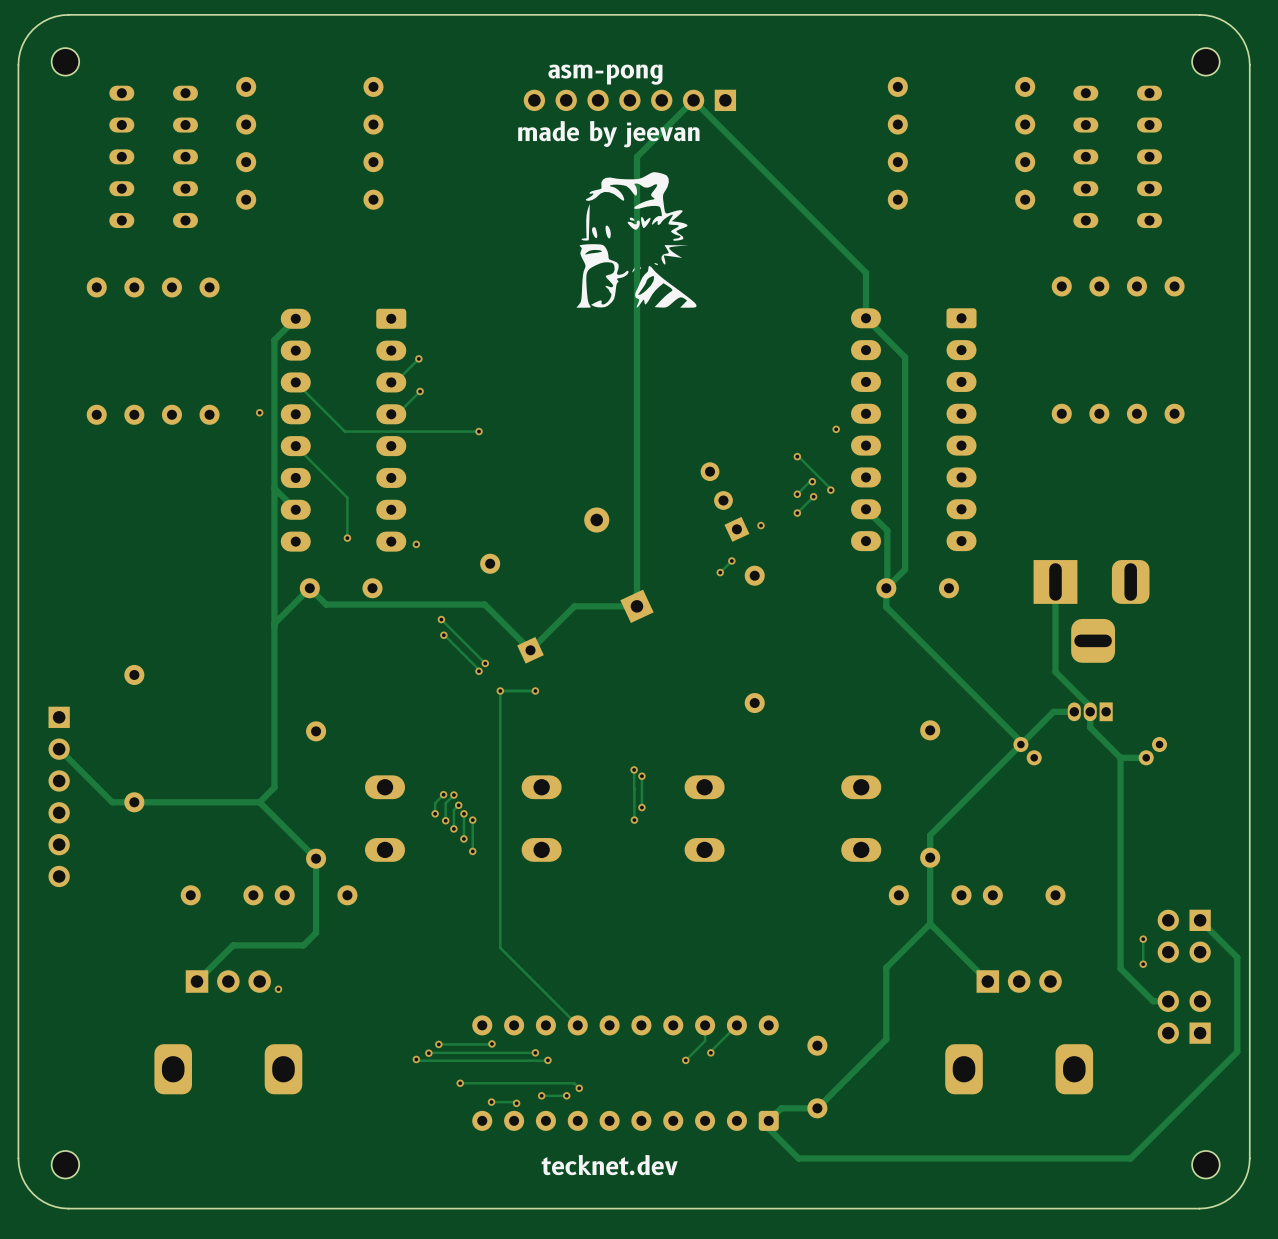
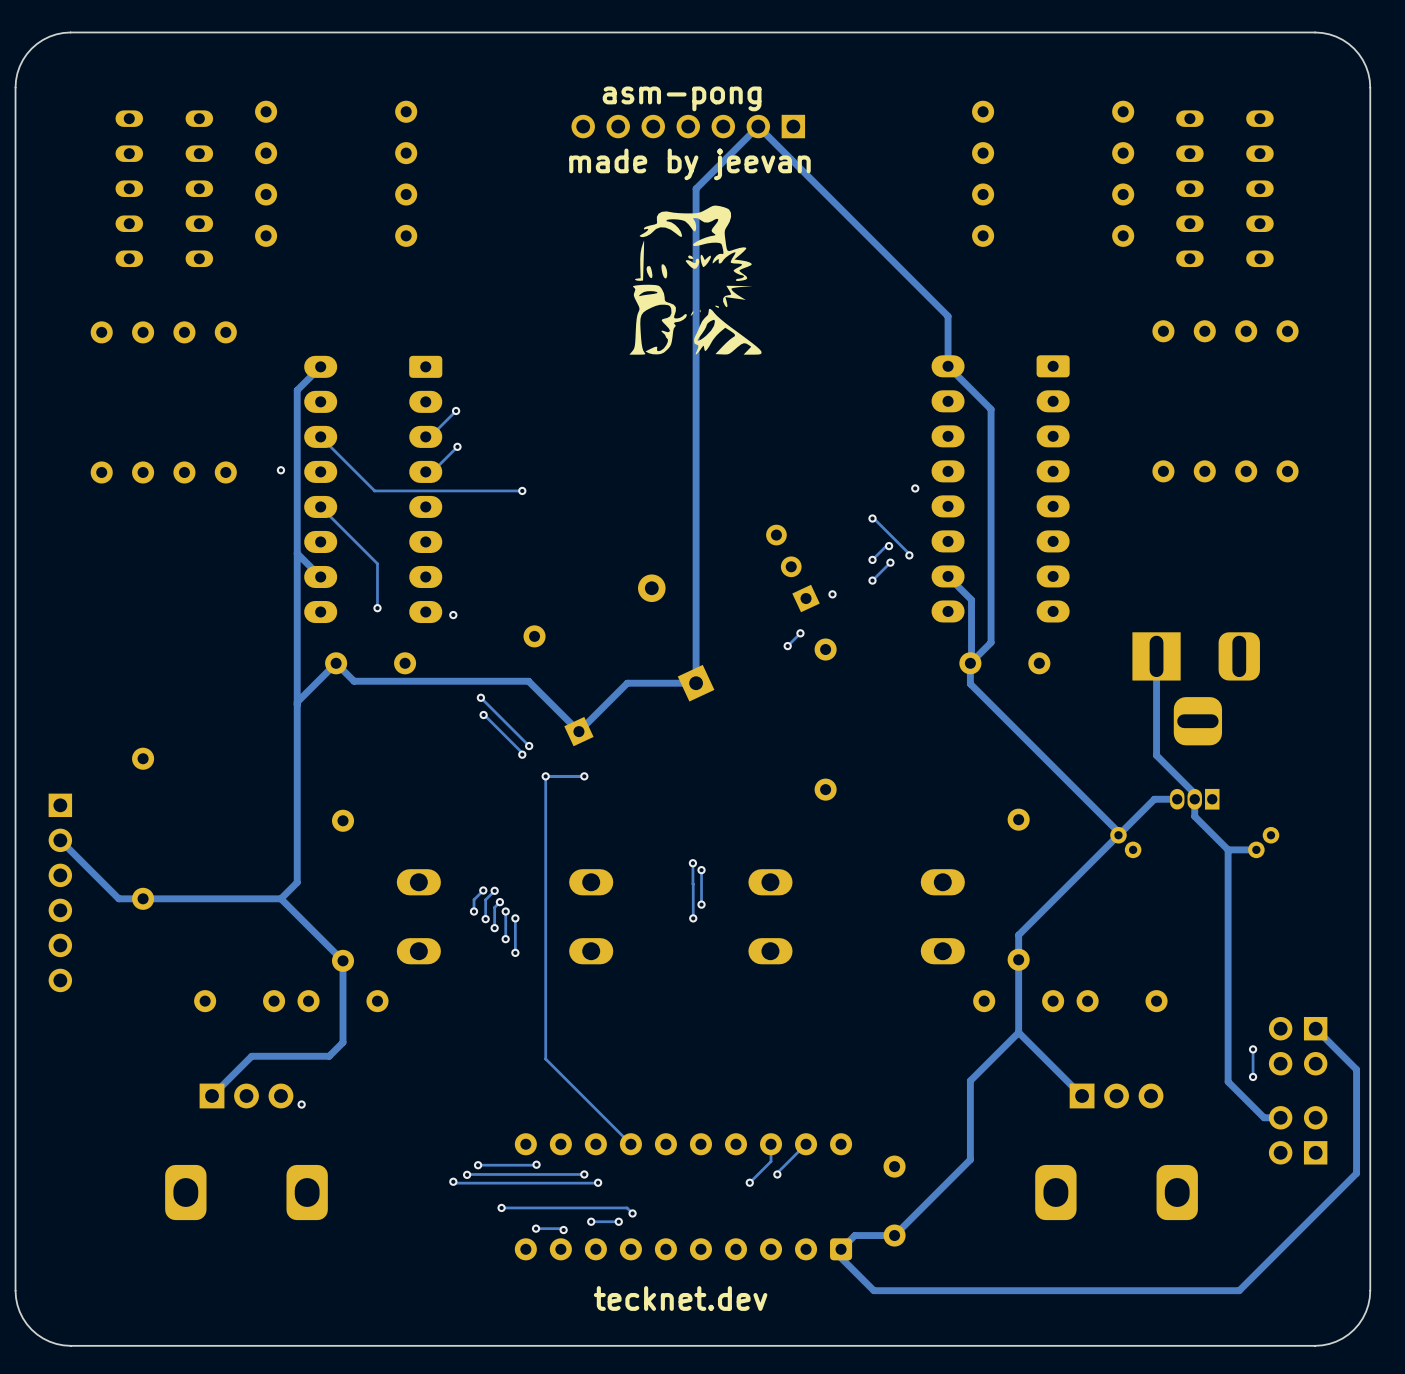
part: (65, 61) -> none
part: (1205, 61) -> none
part: (65, 1164) -> none
part: (1205, 1164) -> none

